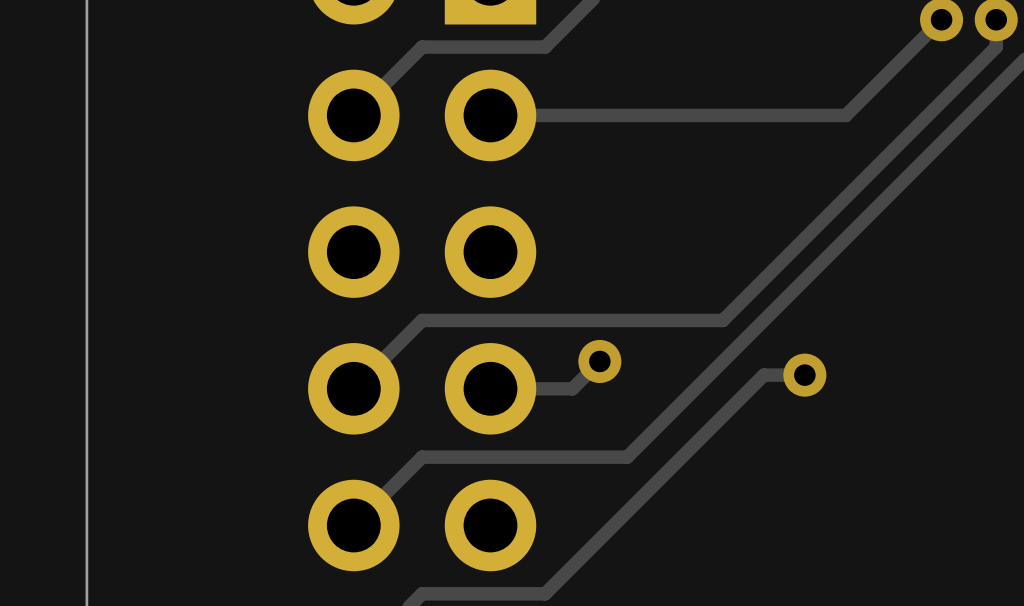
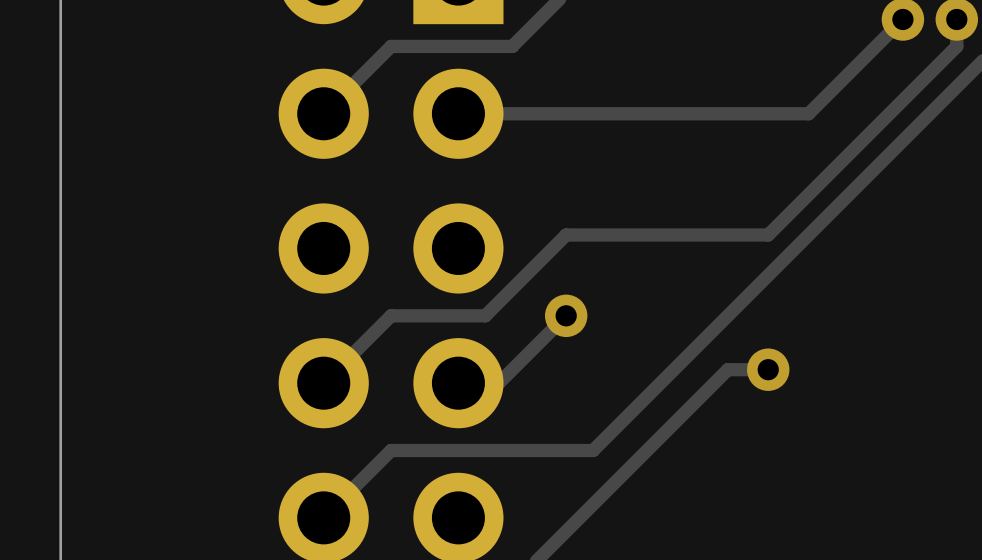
track: (804, 238) (722, 320) (517, 320) -> (768, 235) (566, 235) (485, 315)
track: (599, 361) (572, 388) (531, 388) -> (566, 315) (498, 383)
via position: (599, 361) -> (566, 315)

